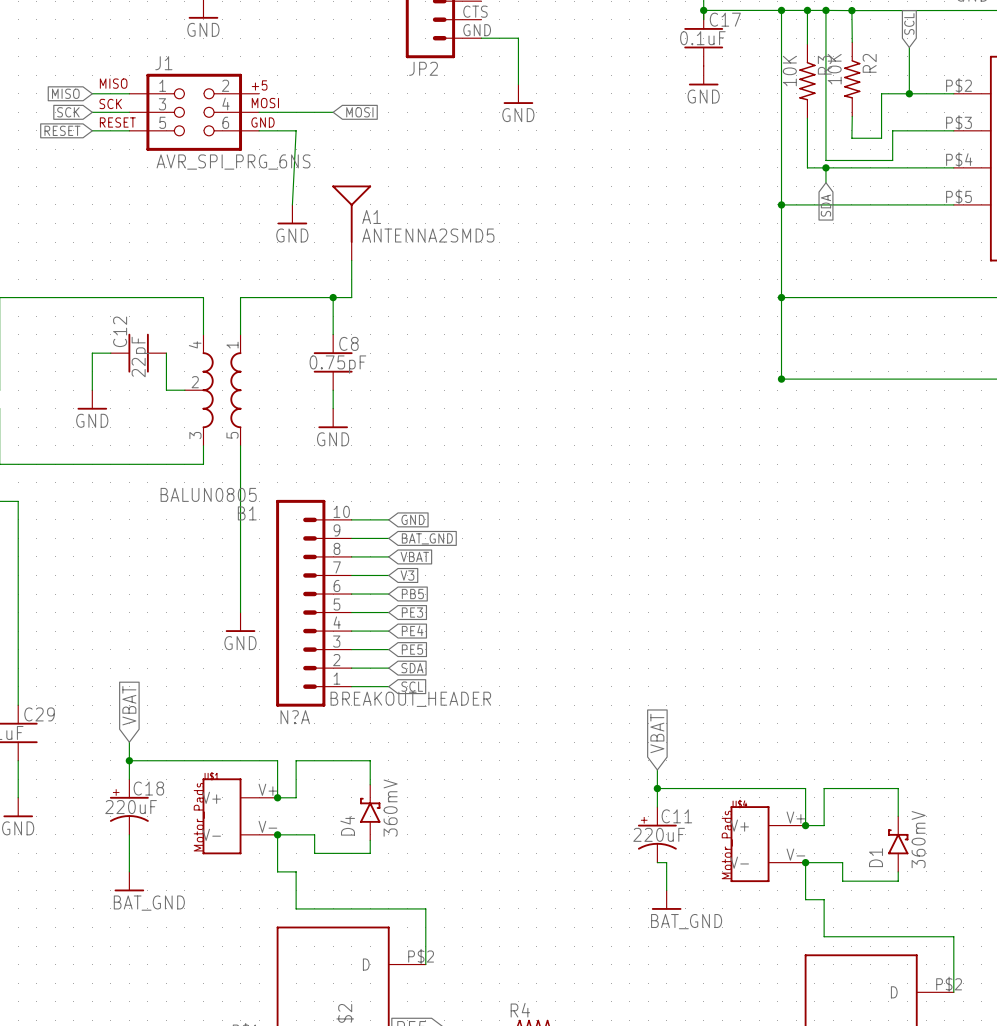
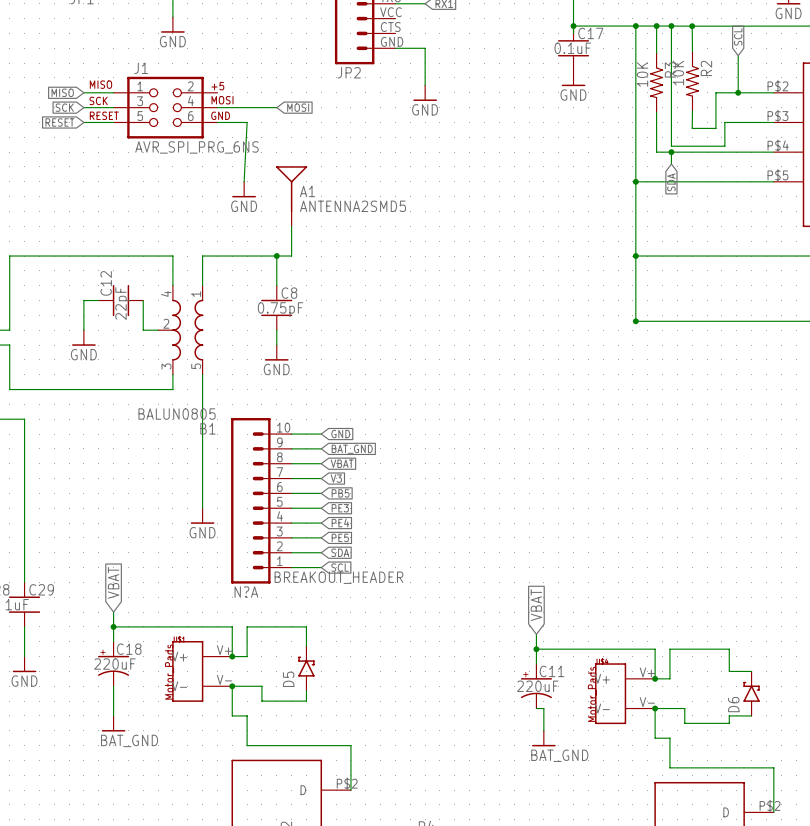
D4 value: 360mV (390, 808) -> none
wire: none -> (729, 671) (751, 671)
D4 name: D4 (347, 825) -> D5 (288, 679)
D1: 360mV (898, 844) -> none
D6: none -> (751, 693)
wire: none -> (729, 715) (751, 715)

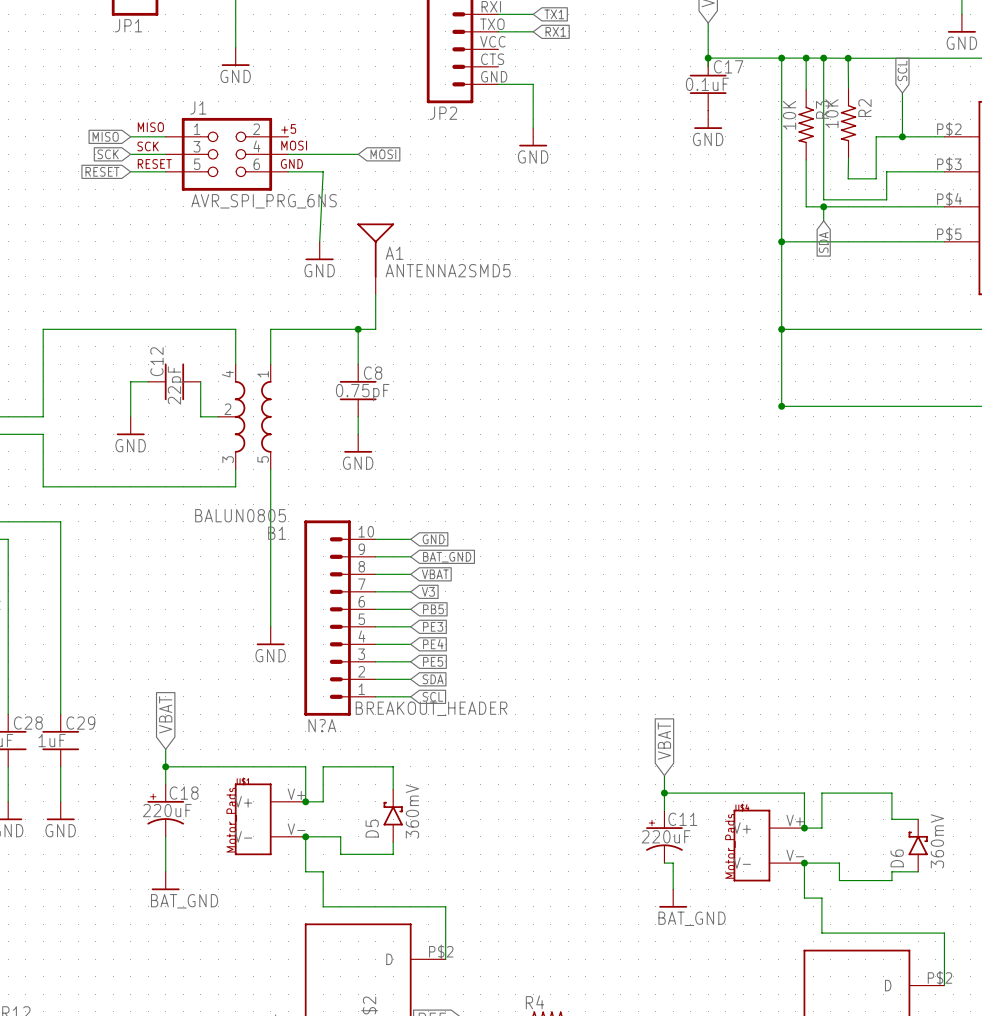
D5 value: none -> 360mV (412, 811)
D6 value: none -> 360mV (937, 841)

